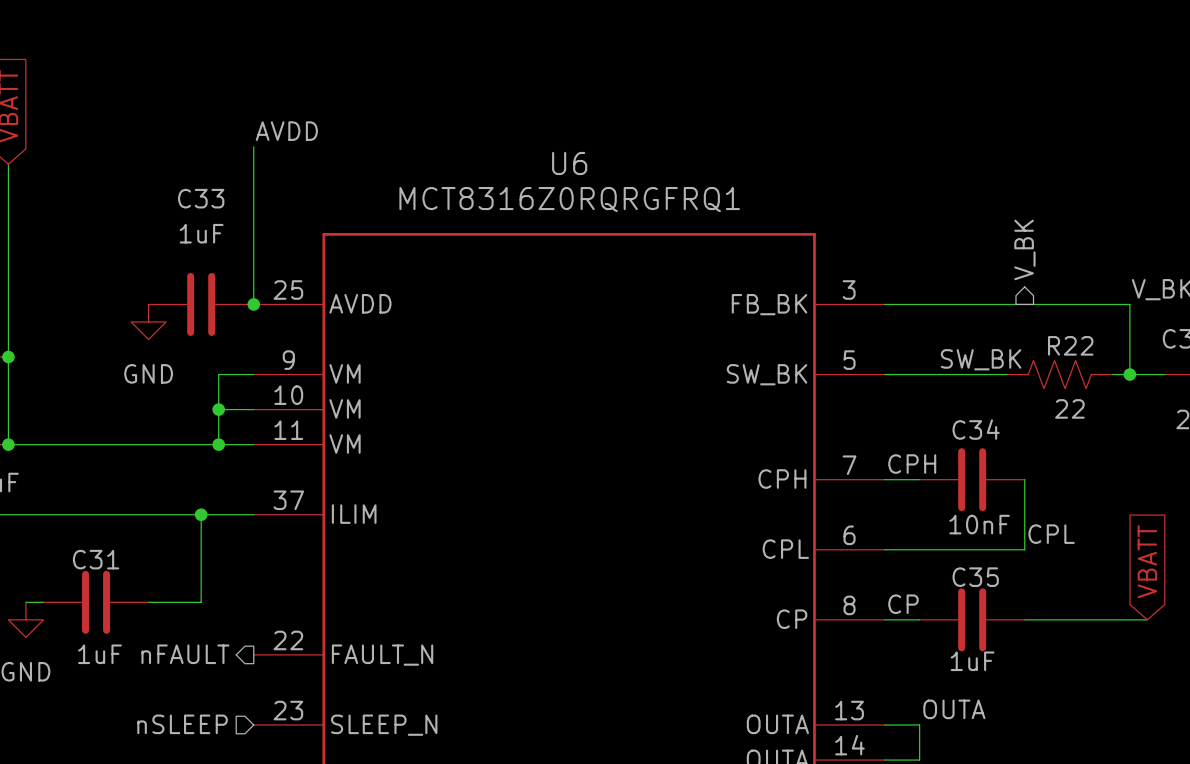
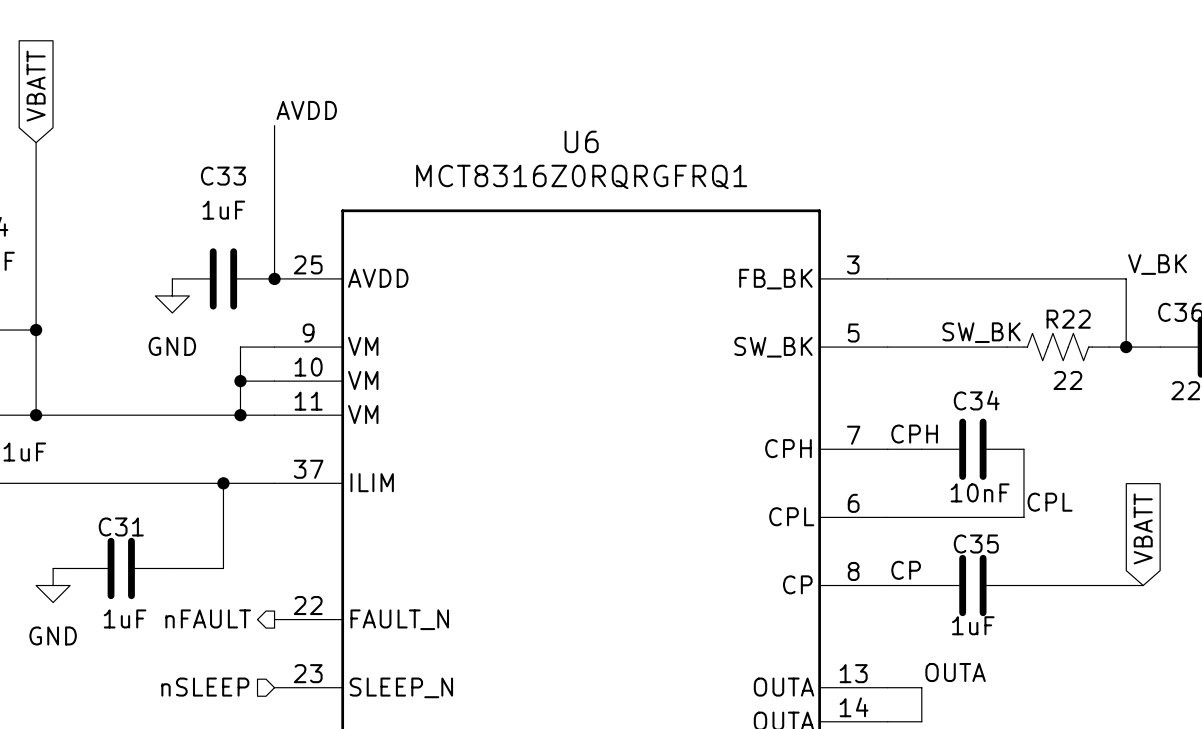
hierarchical label: V_BK (1024, 249) -> none

